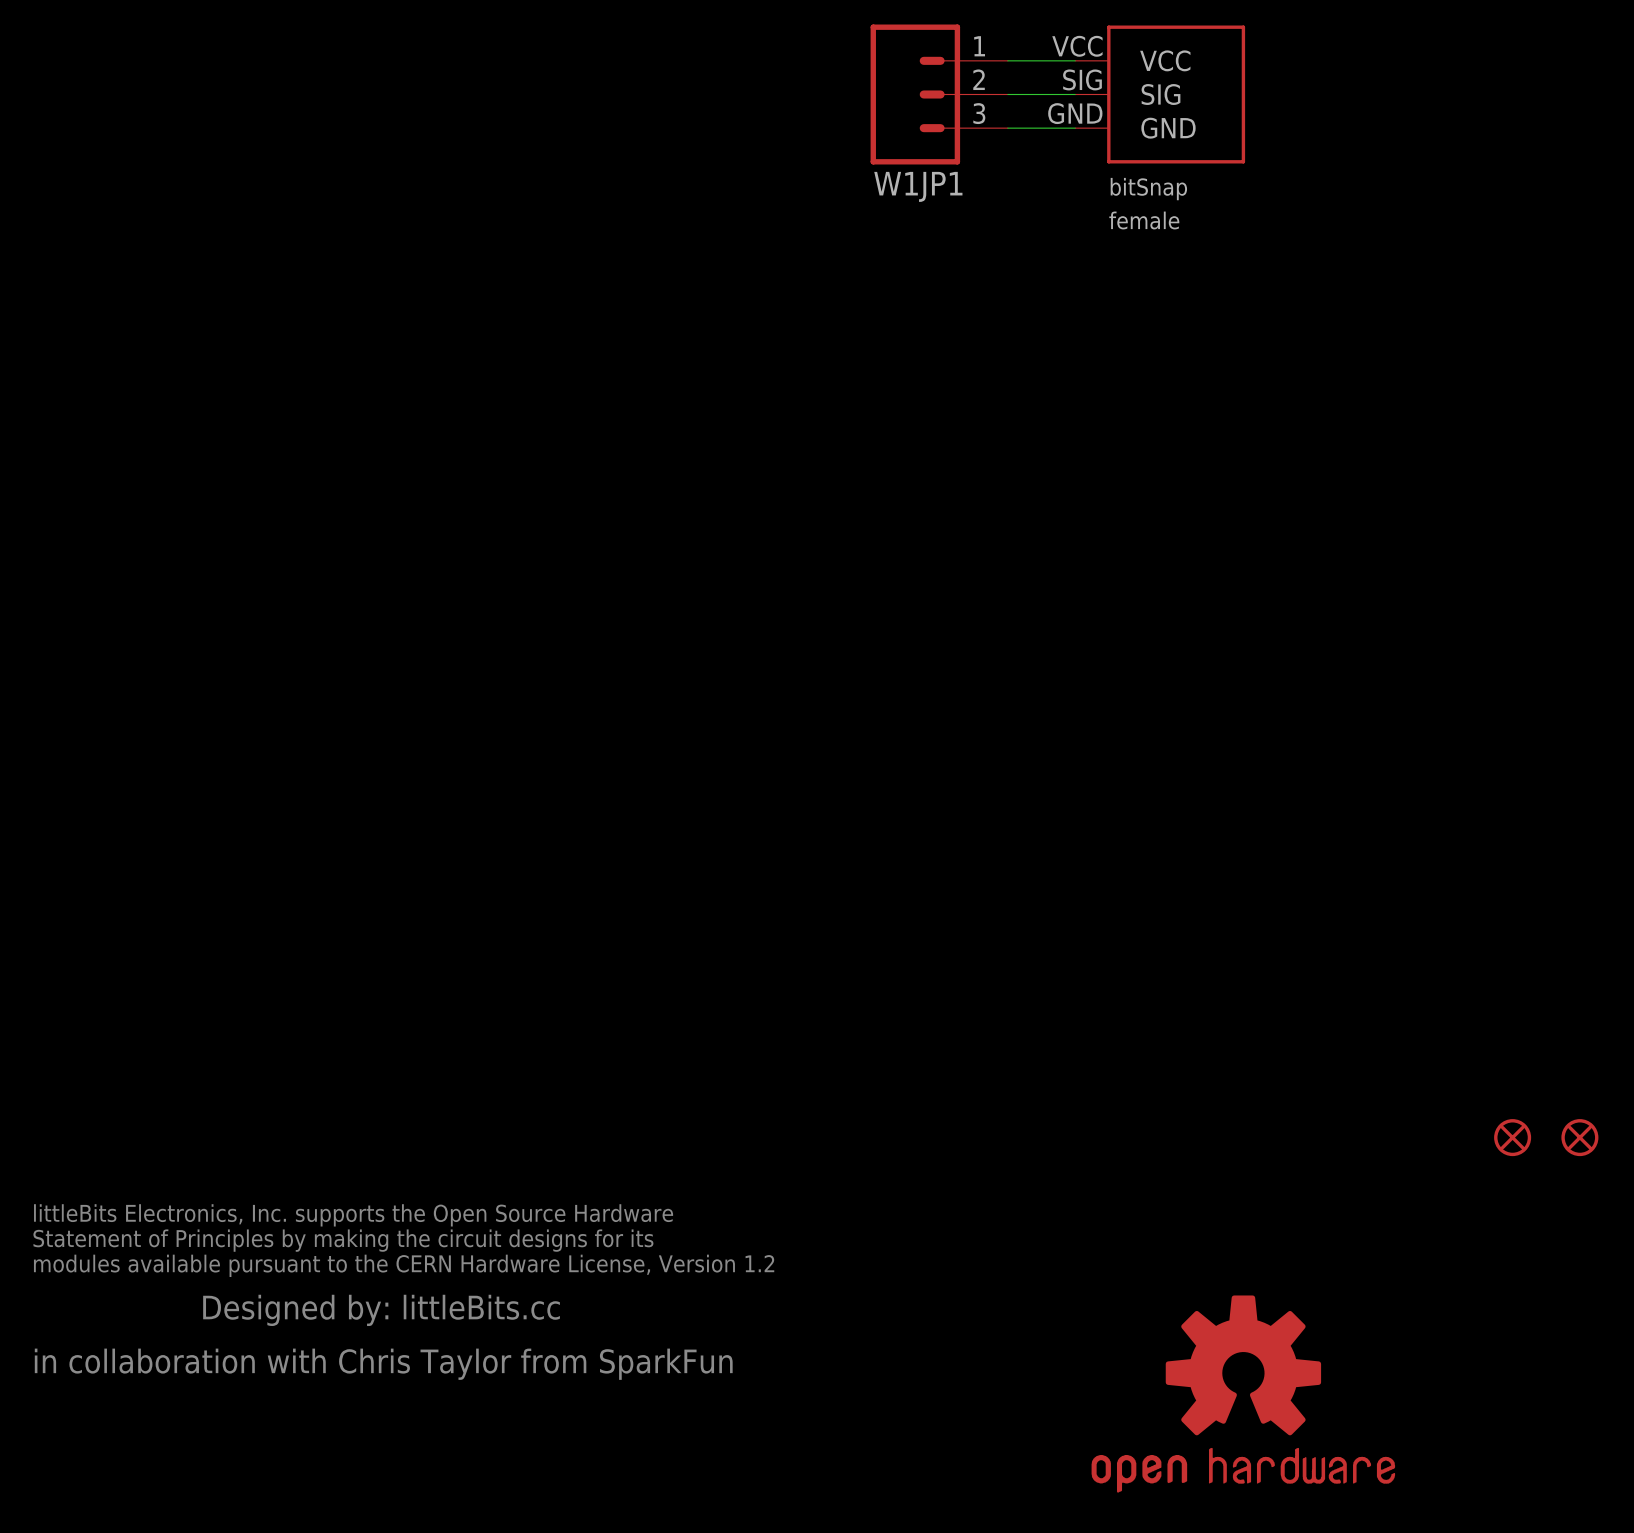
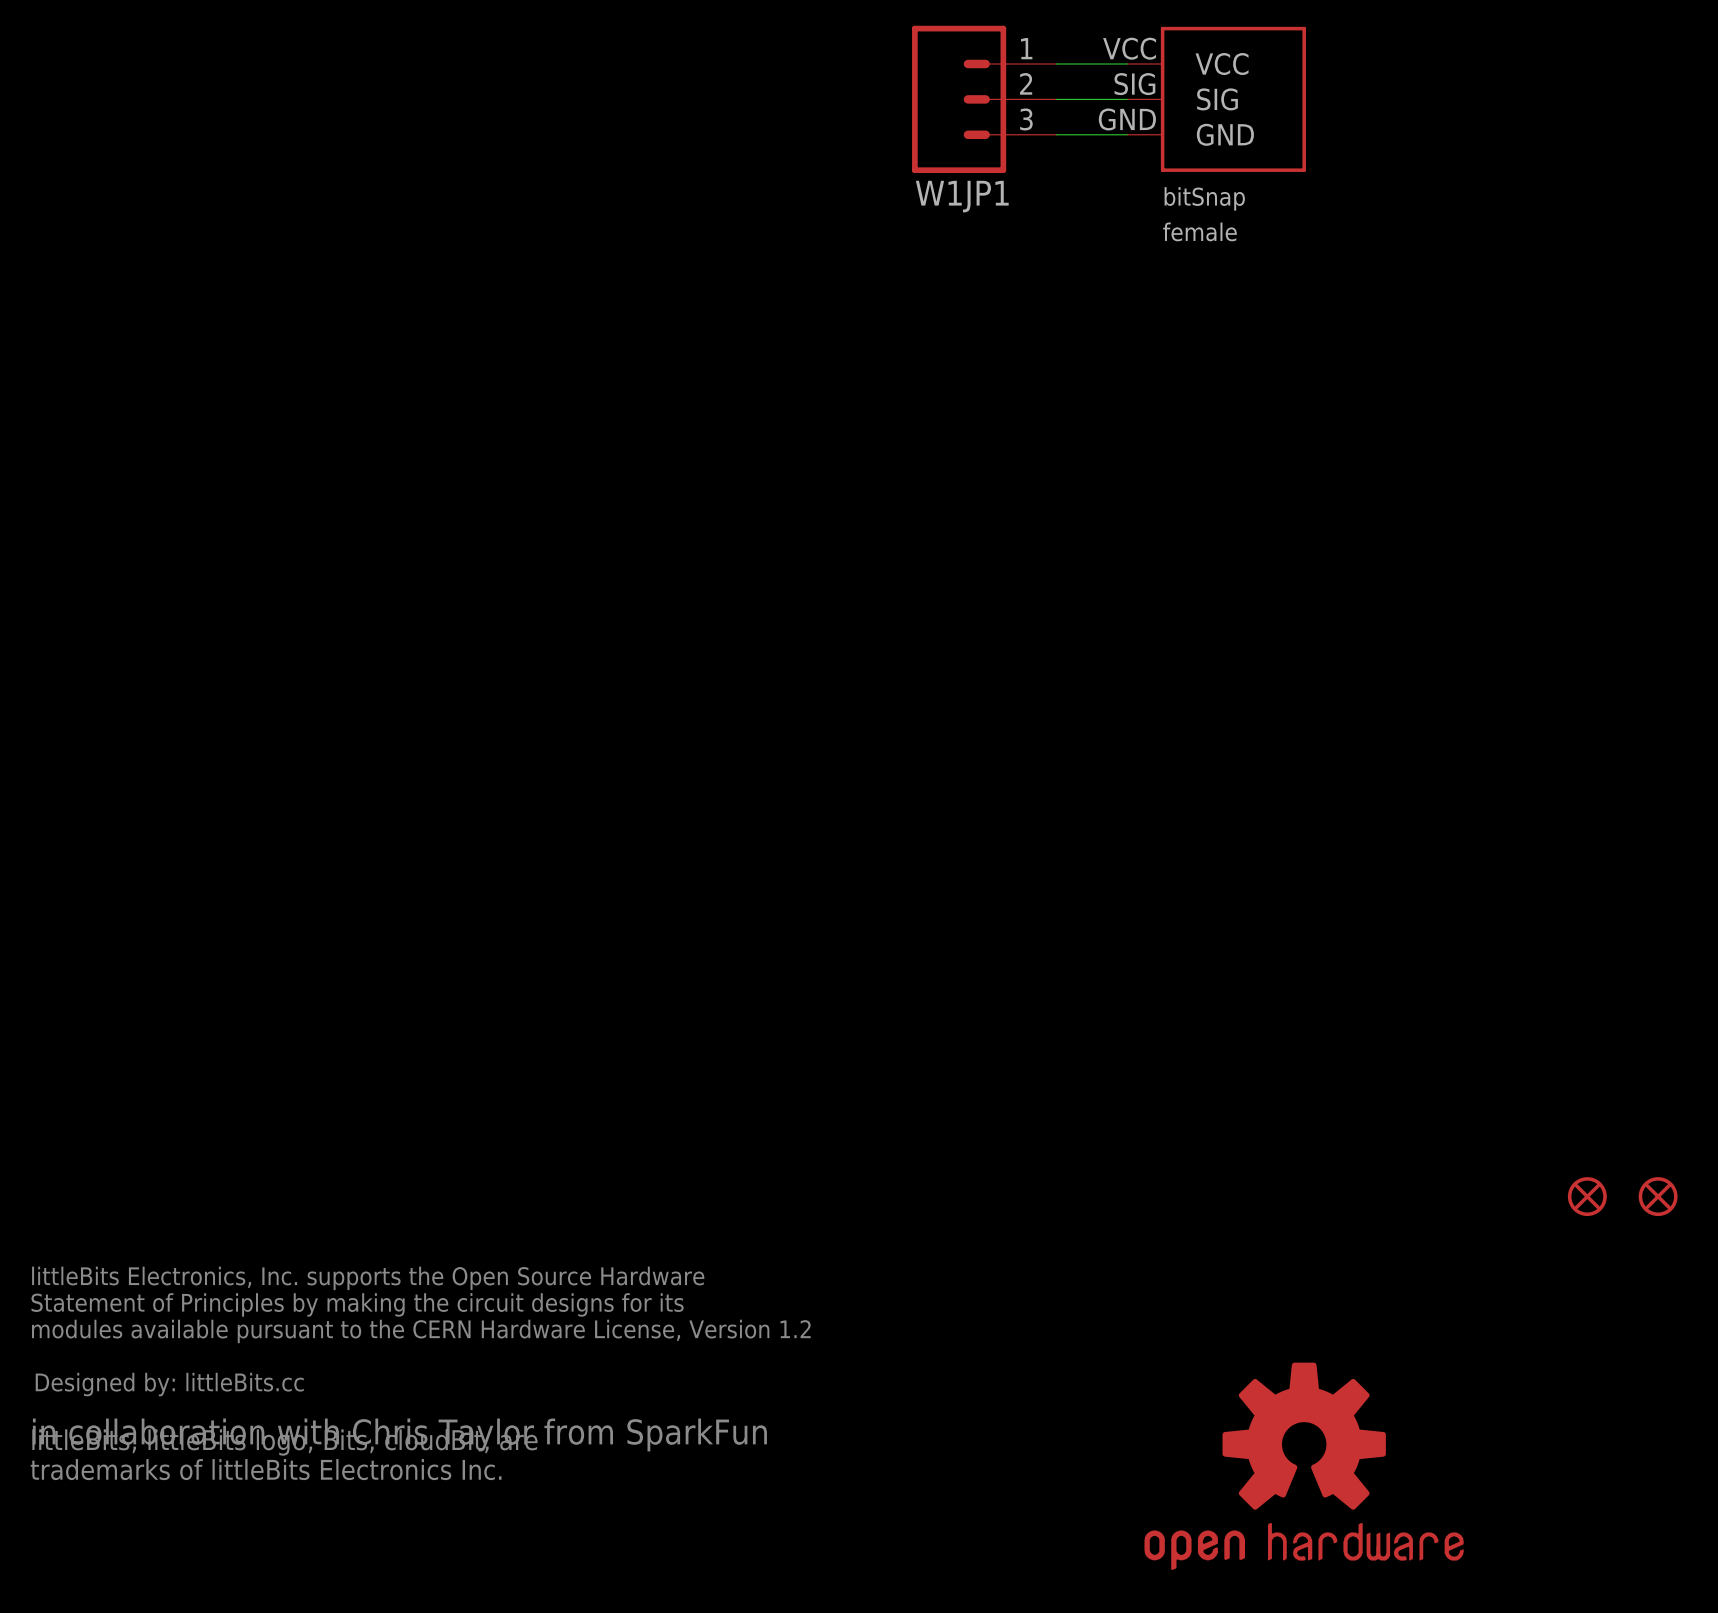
part: (403, 1265) -> none
part: none -> (420, 1373)

